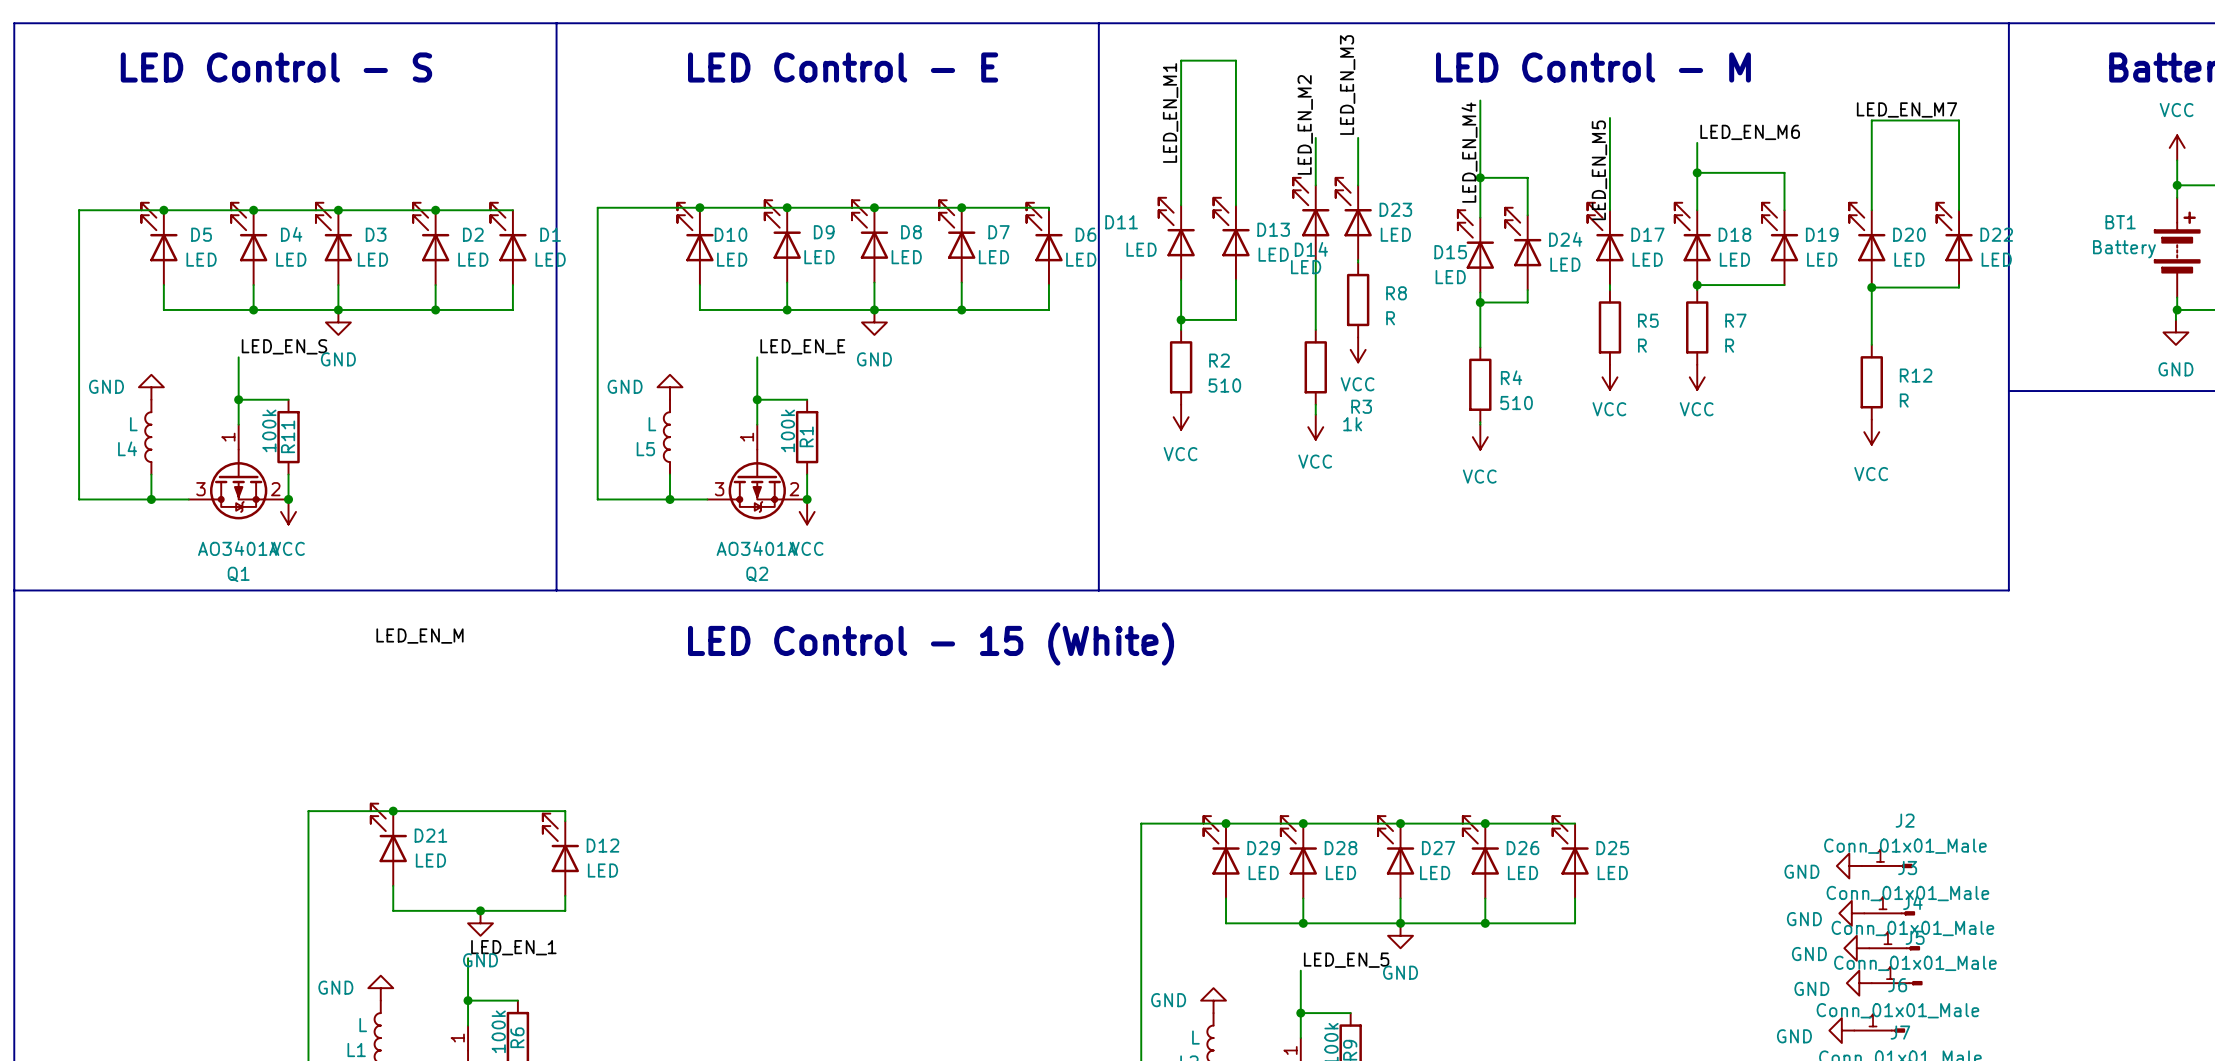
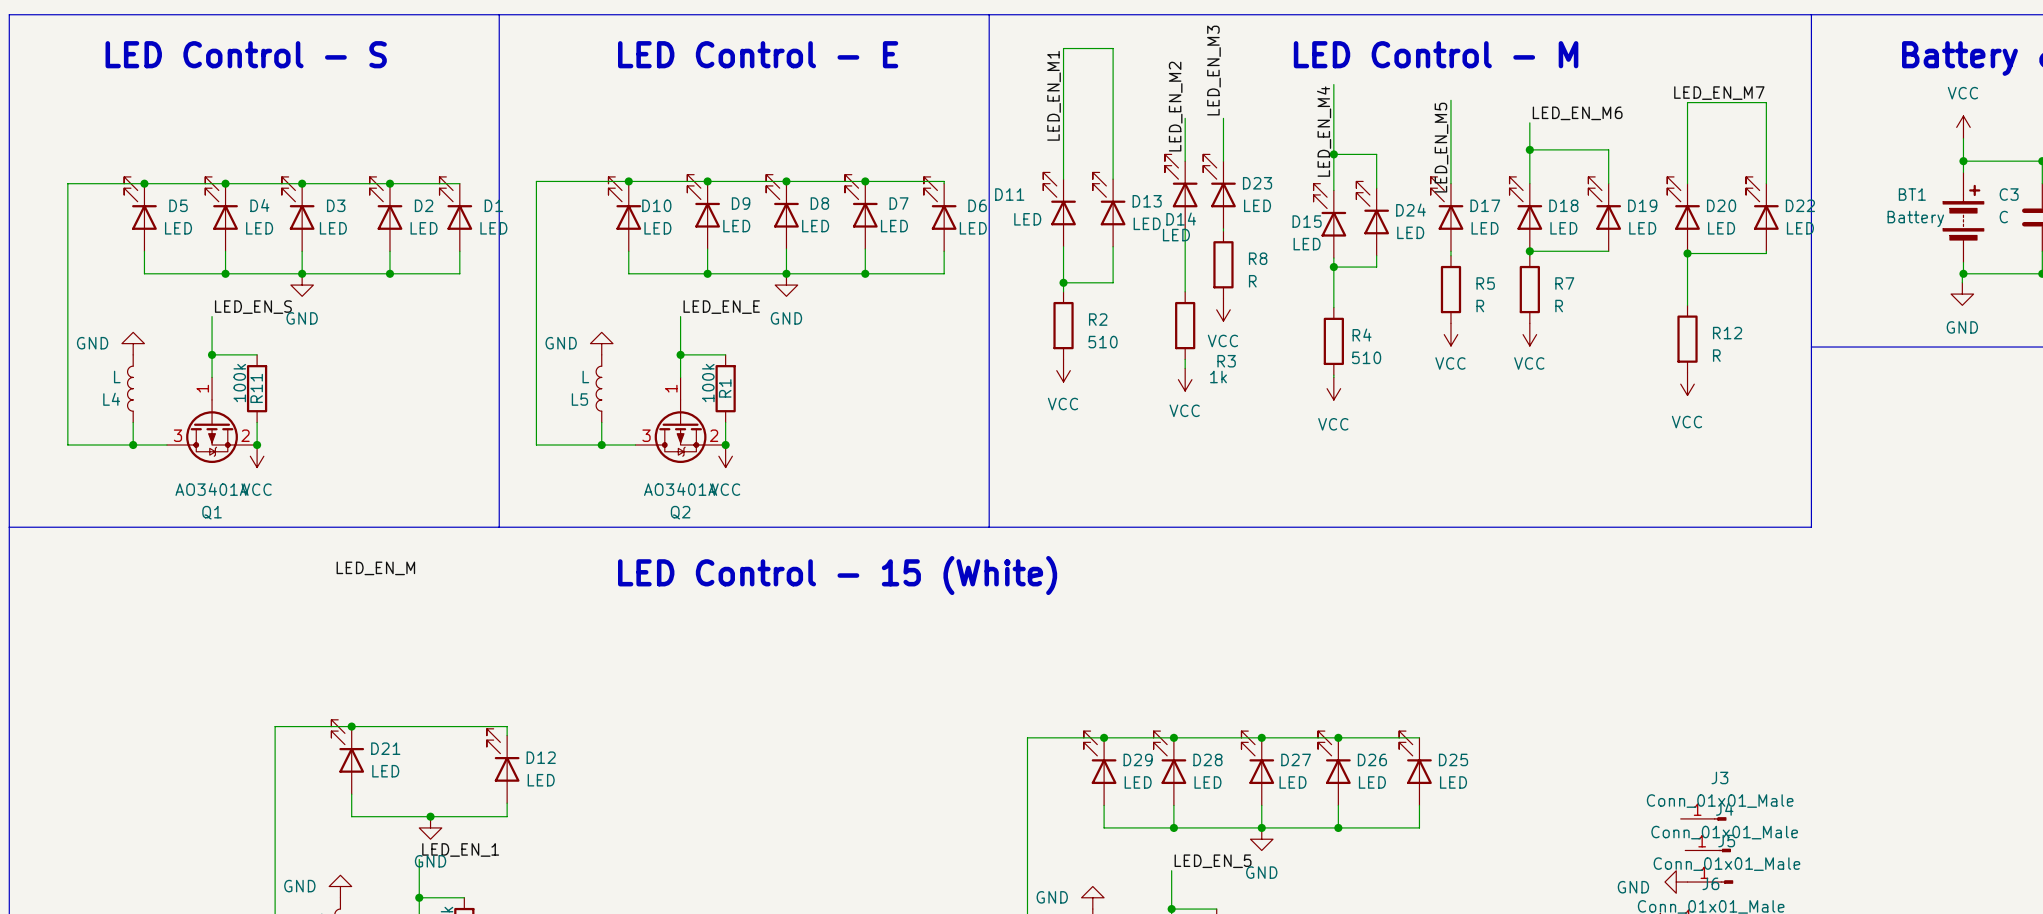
power symbol: GND (1849, 865) -> none
J2: Conn_01x01_Male (1887, 865) -> none
power symbol: GND (1851, 913) -> none
power symbol: GND (1856, 948) -> none

